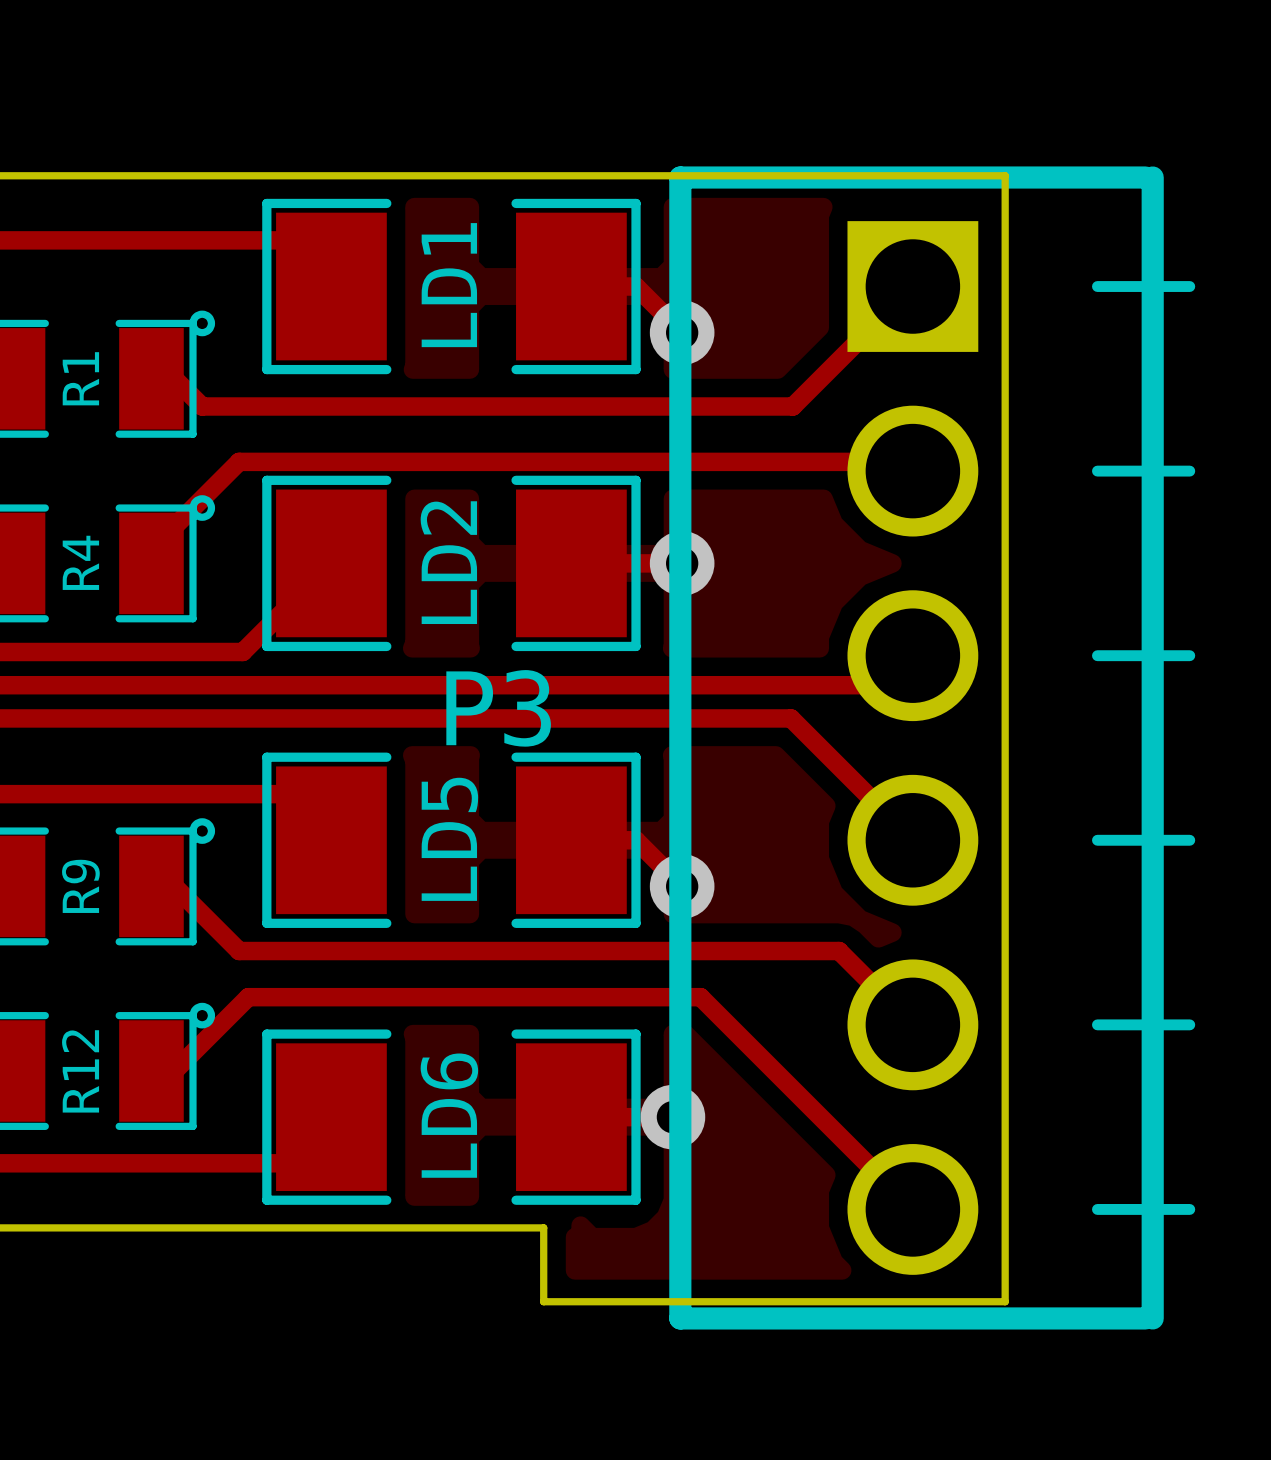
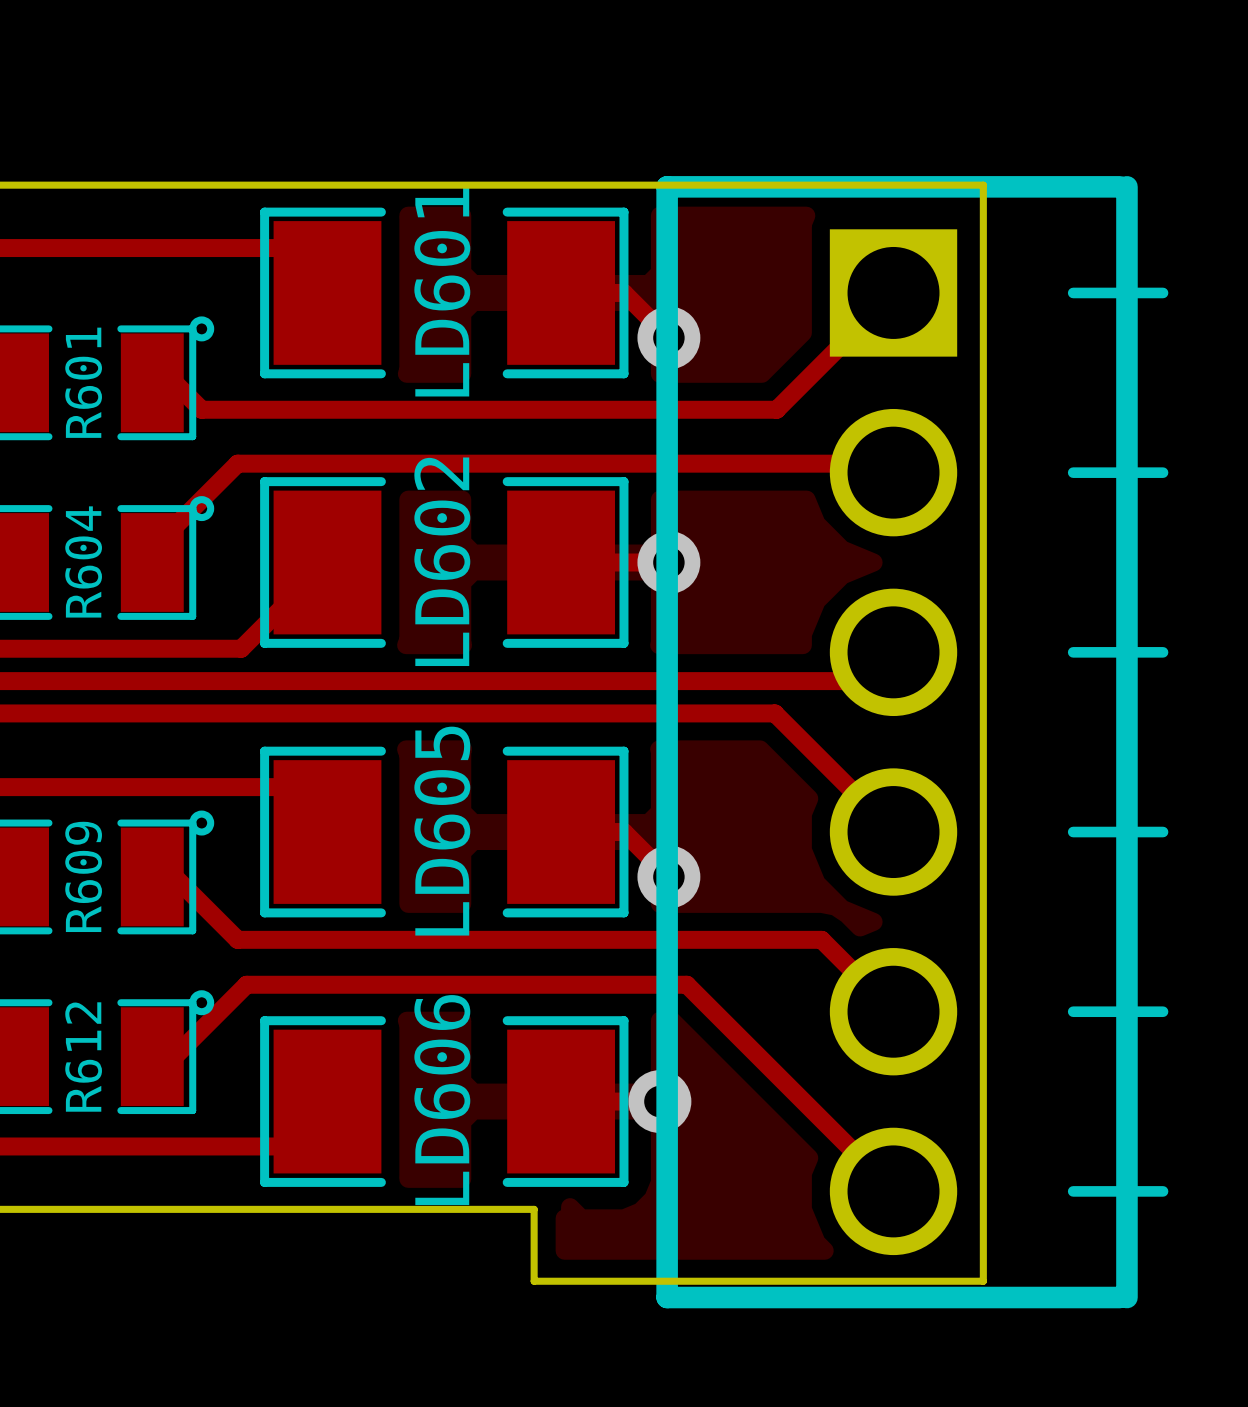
LD1 name: LD1 (449, 285) -> LD601 (442, 291)
R1 name: R1 (80, 378) -> R601 (83, 382)
R4 name: R4 (80, 562) -> R604 (83, 561)
LD2 name: LD2 (448, 562) -> LD602 (442, 561)
P3 name: P3 (498, 708) -> none
LD5 name: LD5 (449, 839) -> LD605 (442, 831)
R9 name: R9 (80, 886) -> R609 (83, 876)
R12 name: R12 (80, 1071) -> R612 (83, 1057)
LD6 name: LD6 (449, 1115) -> LD606 (442, 1100)

